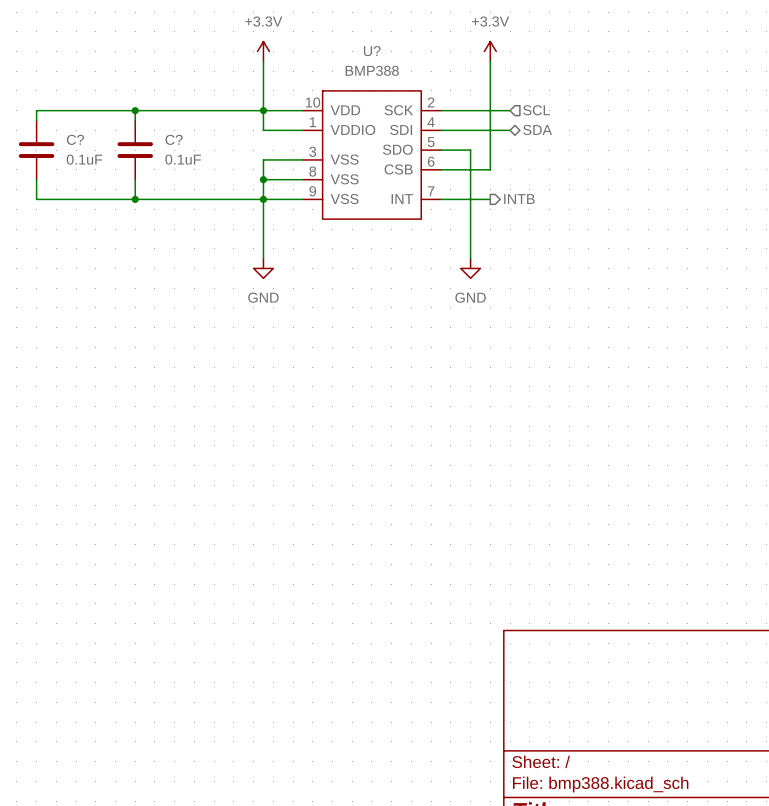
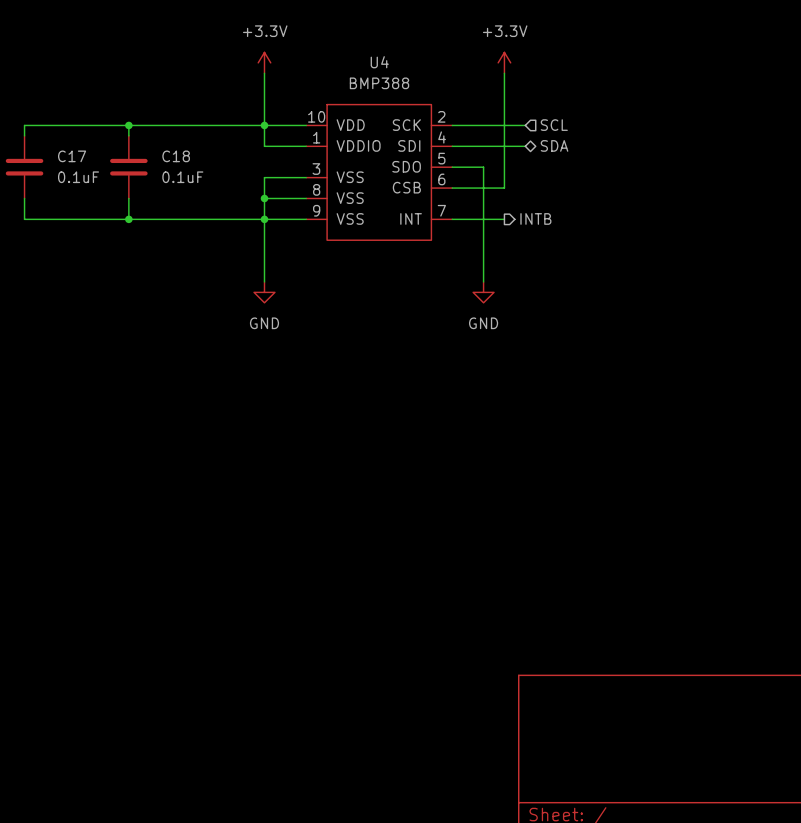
U? name: U? (372, 51) -> U4 (379, 62)
C? name: C? (75, 139) -> C17 (72, 156)
C? name: C? (174, 139) -> C18 (176, 156)

